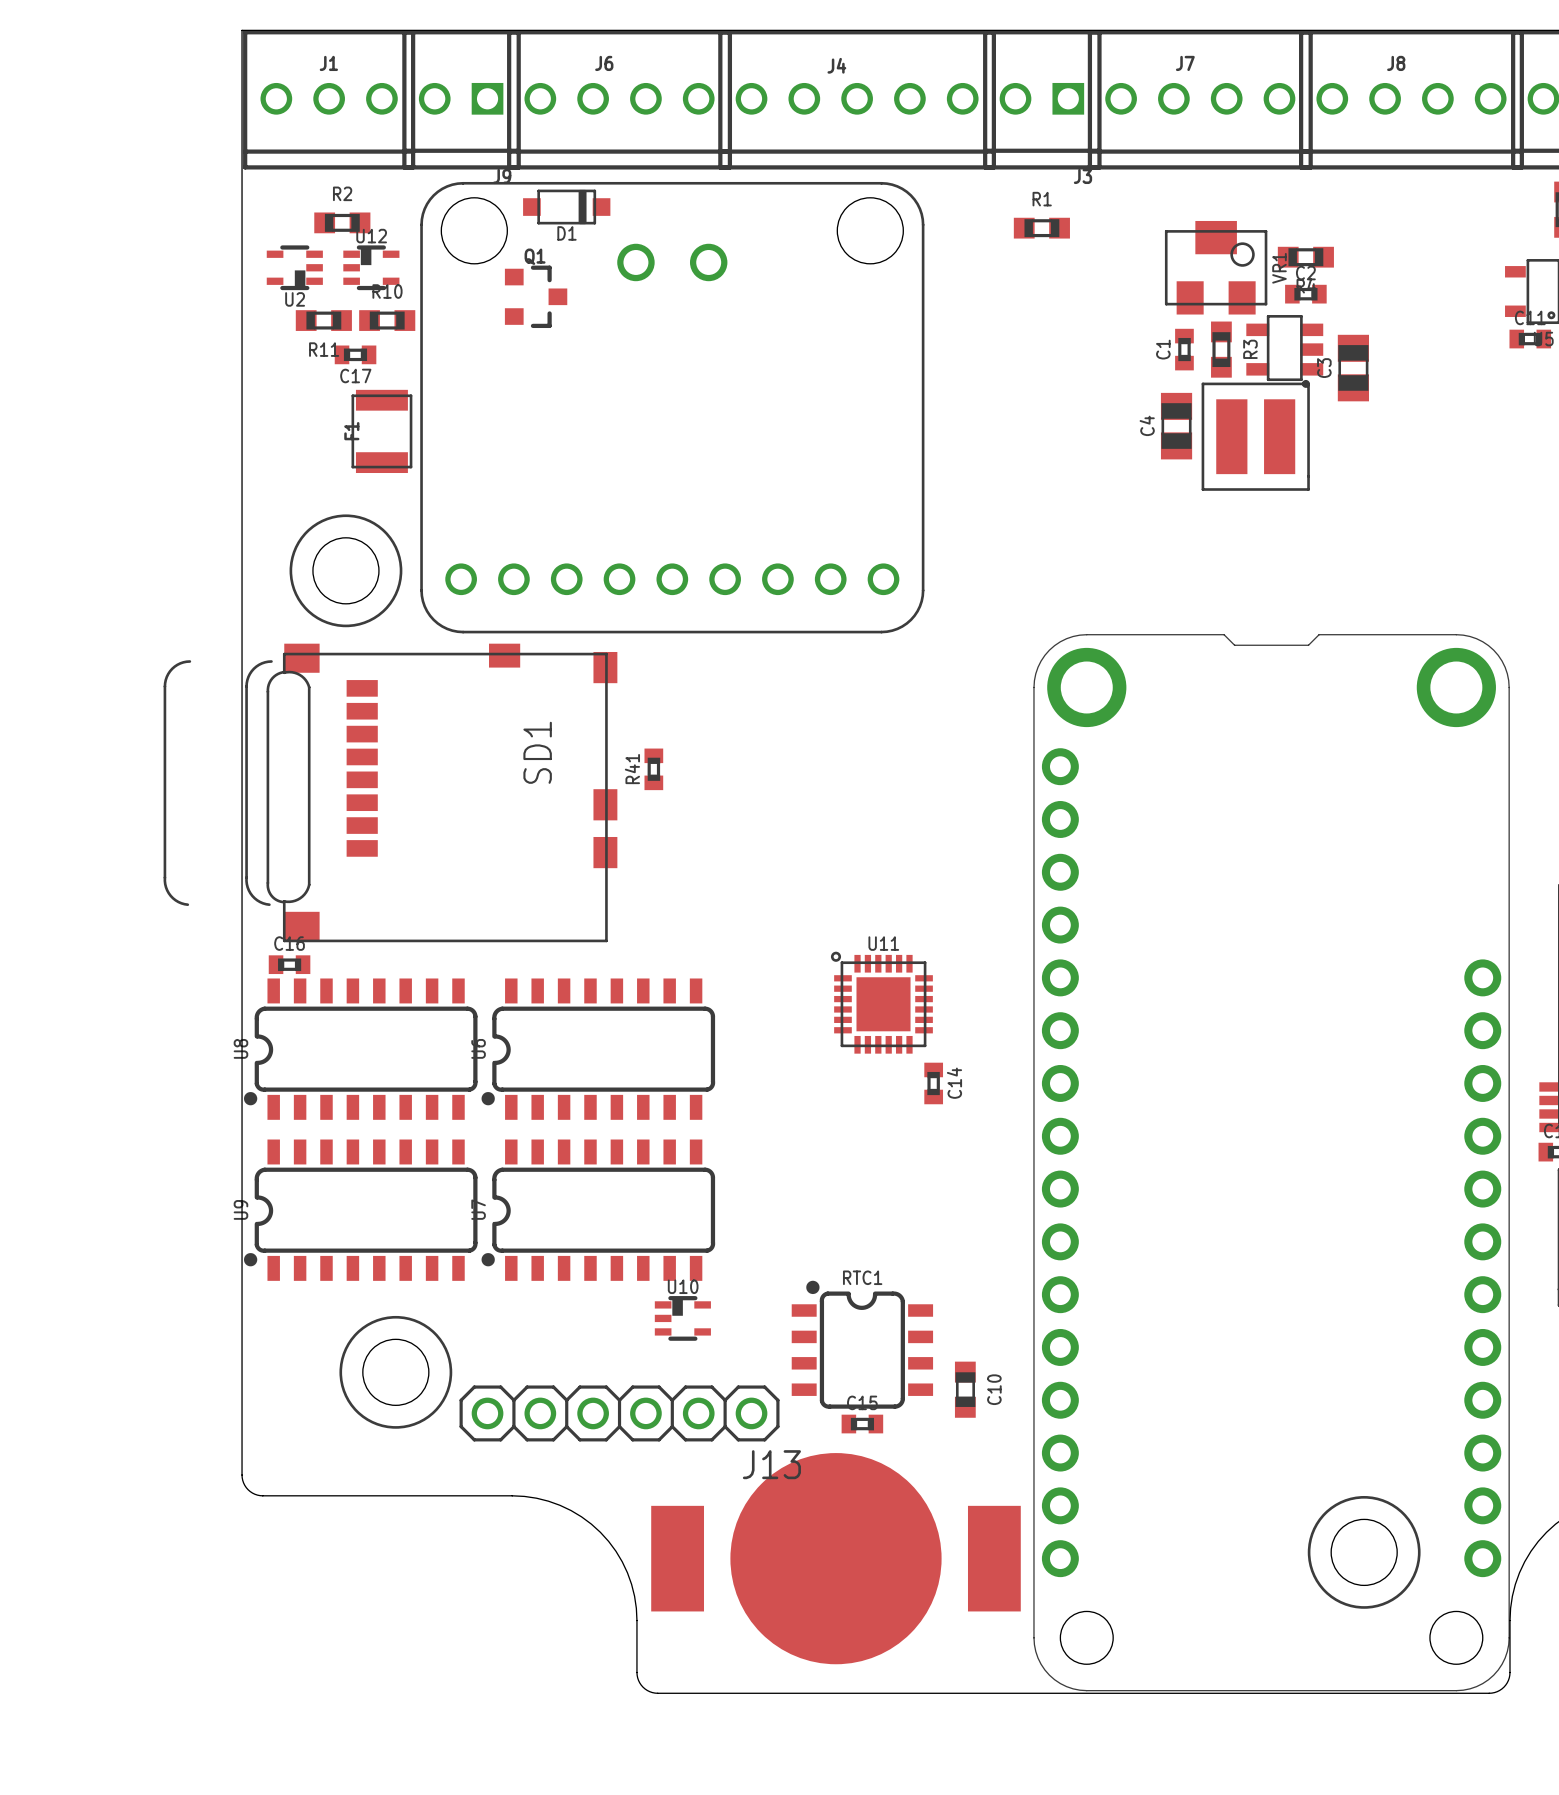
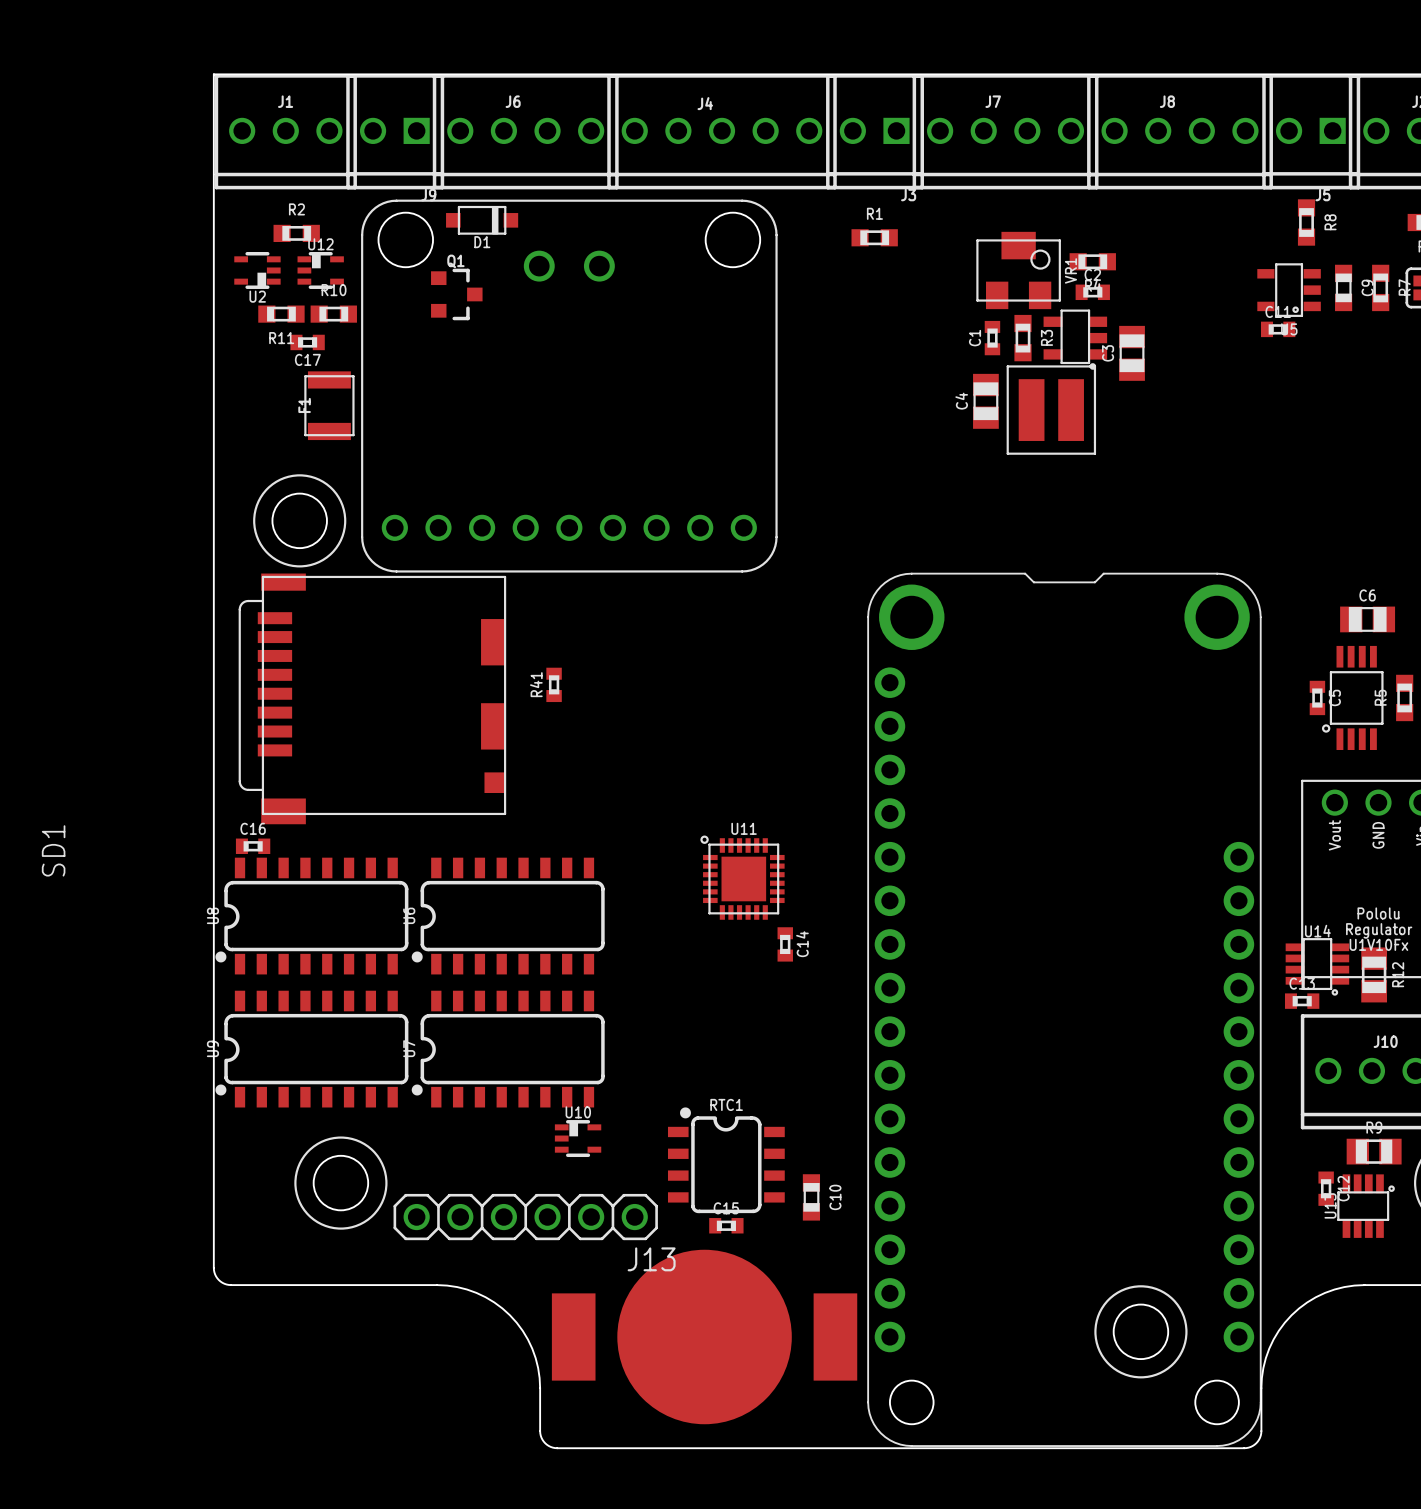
SD1 footprint: [163, 643, 618, 943] -> [238, 573, 507, 825]
SD1 name position: SD1 (537, 752) -> SD1 (53, 850)

